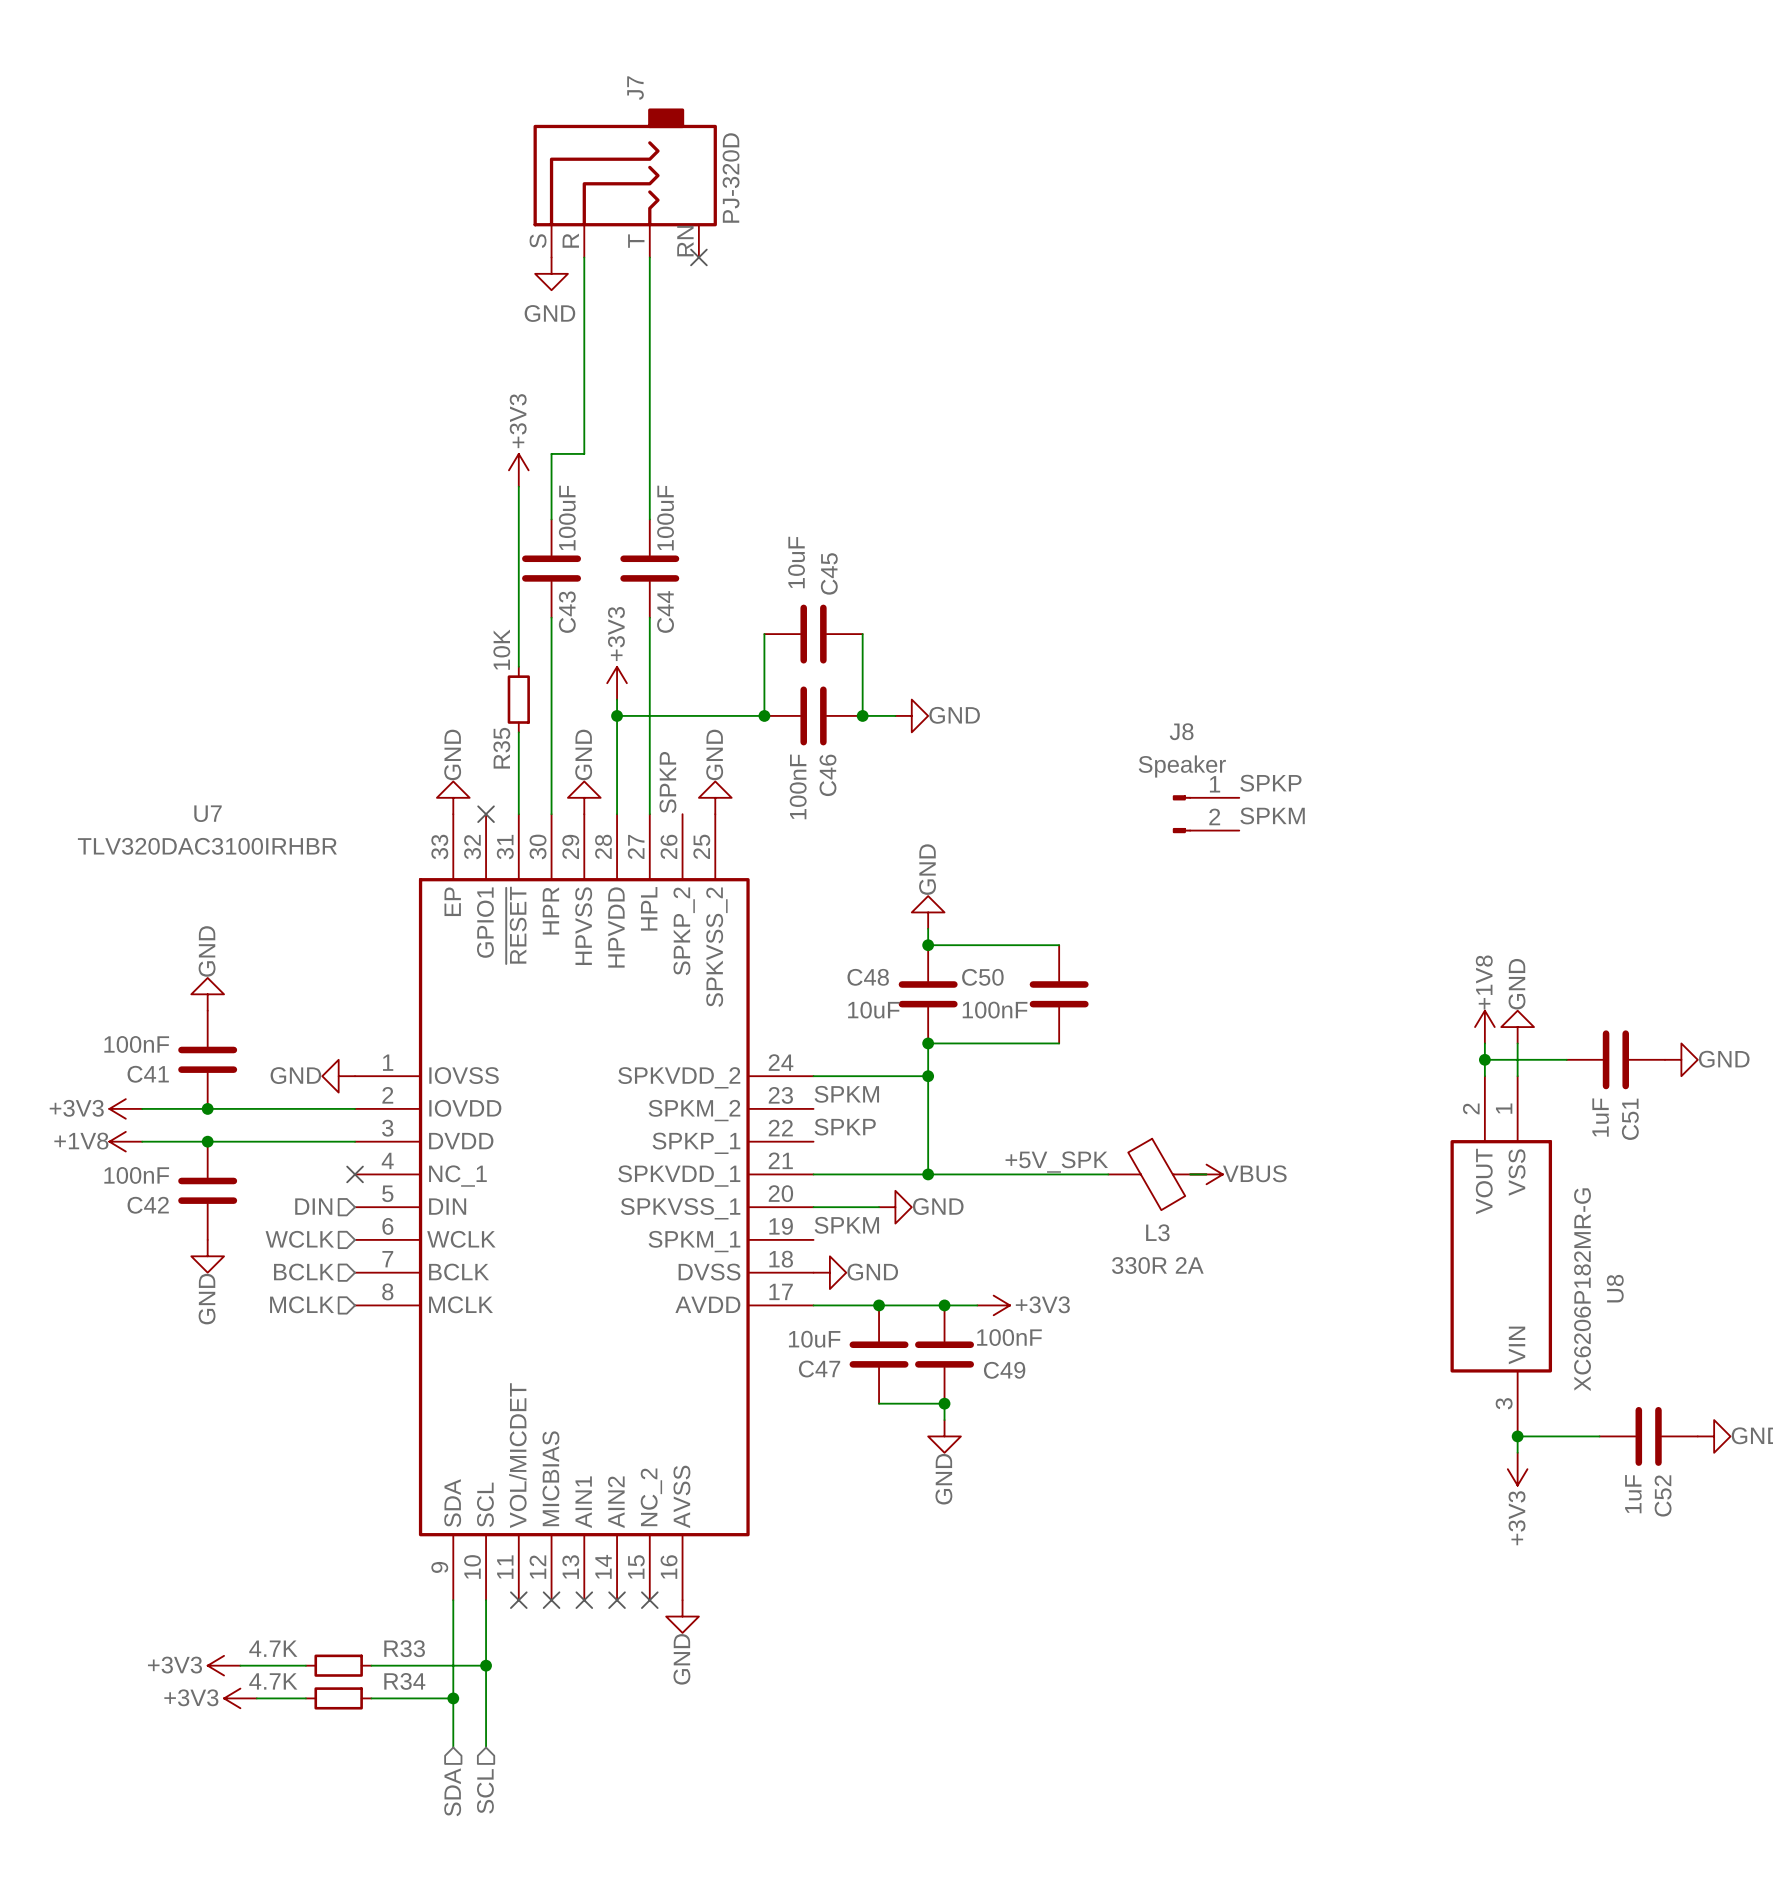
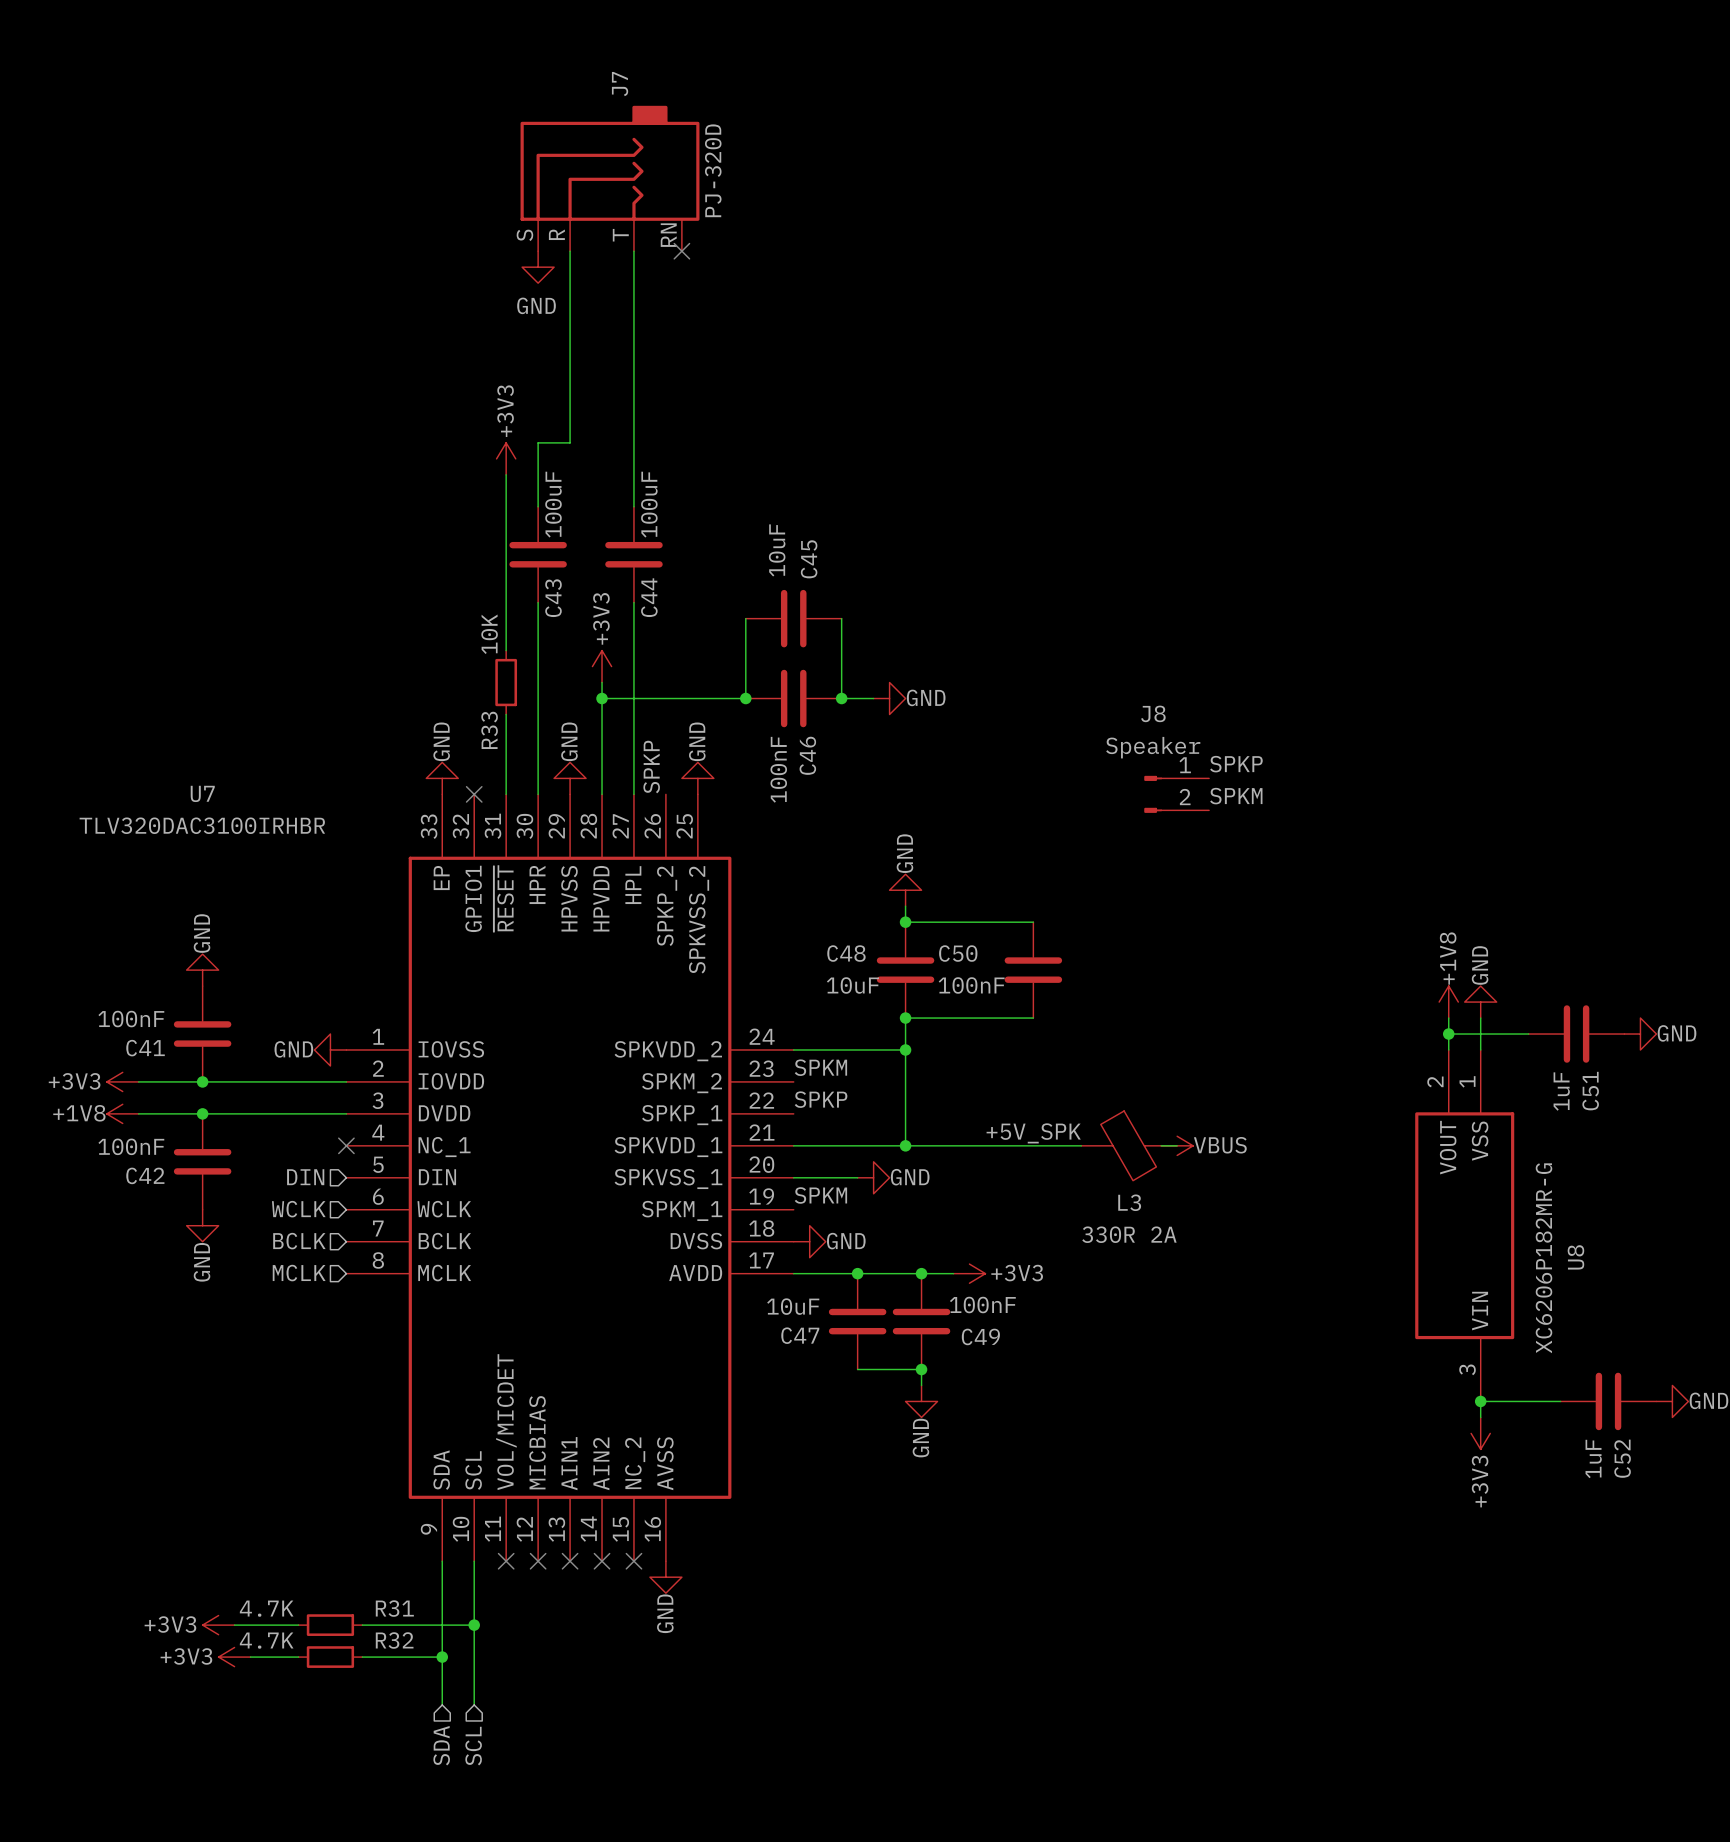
R35 name: R35 (501, 748) -> R33 (489, 730)
R33 name: R33 (404, 1648) -> R31 (394, 1608)
R34 name: R34 (404, 1681) -> R32 (394, 1640)

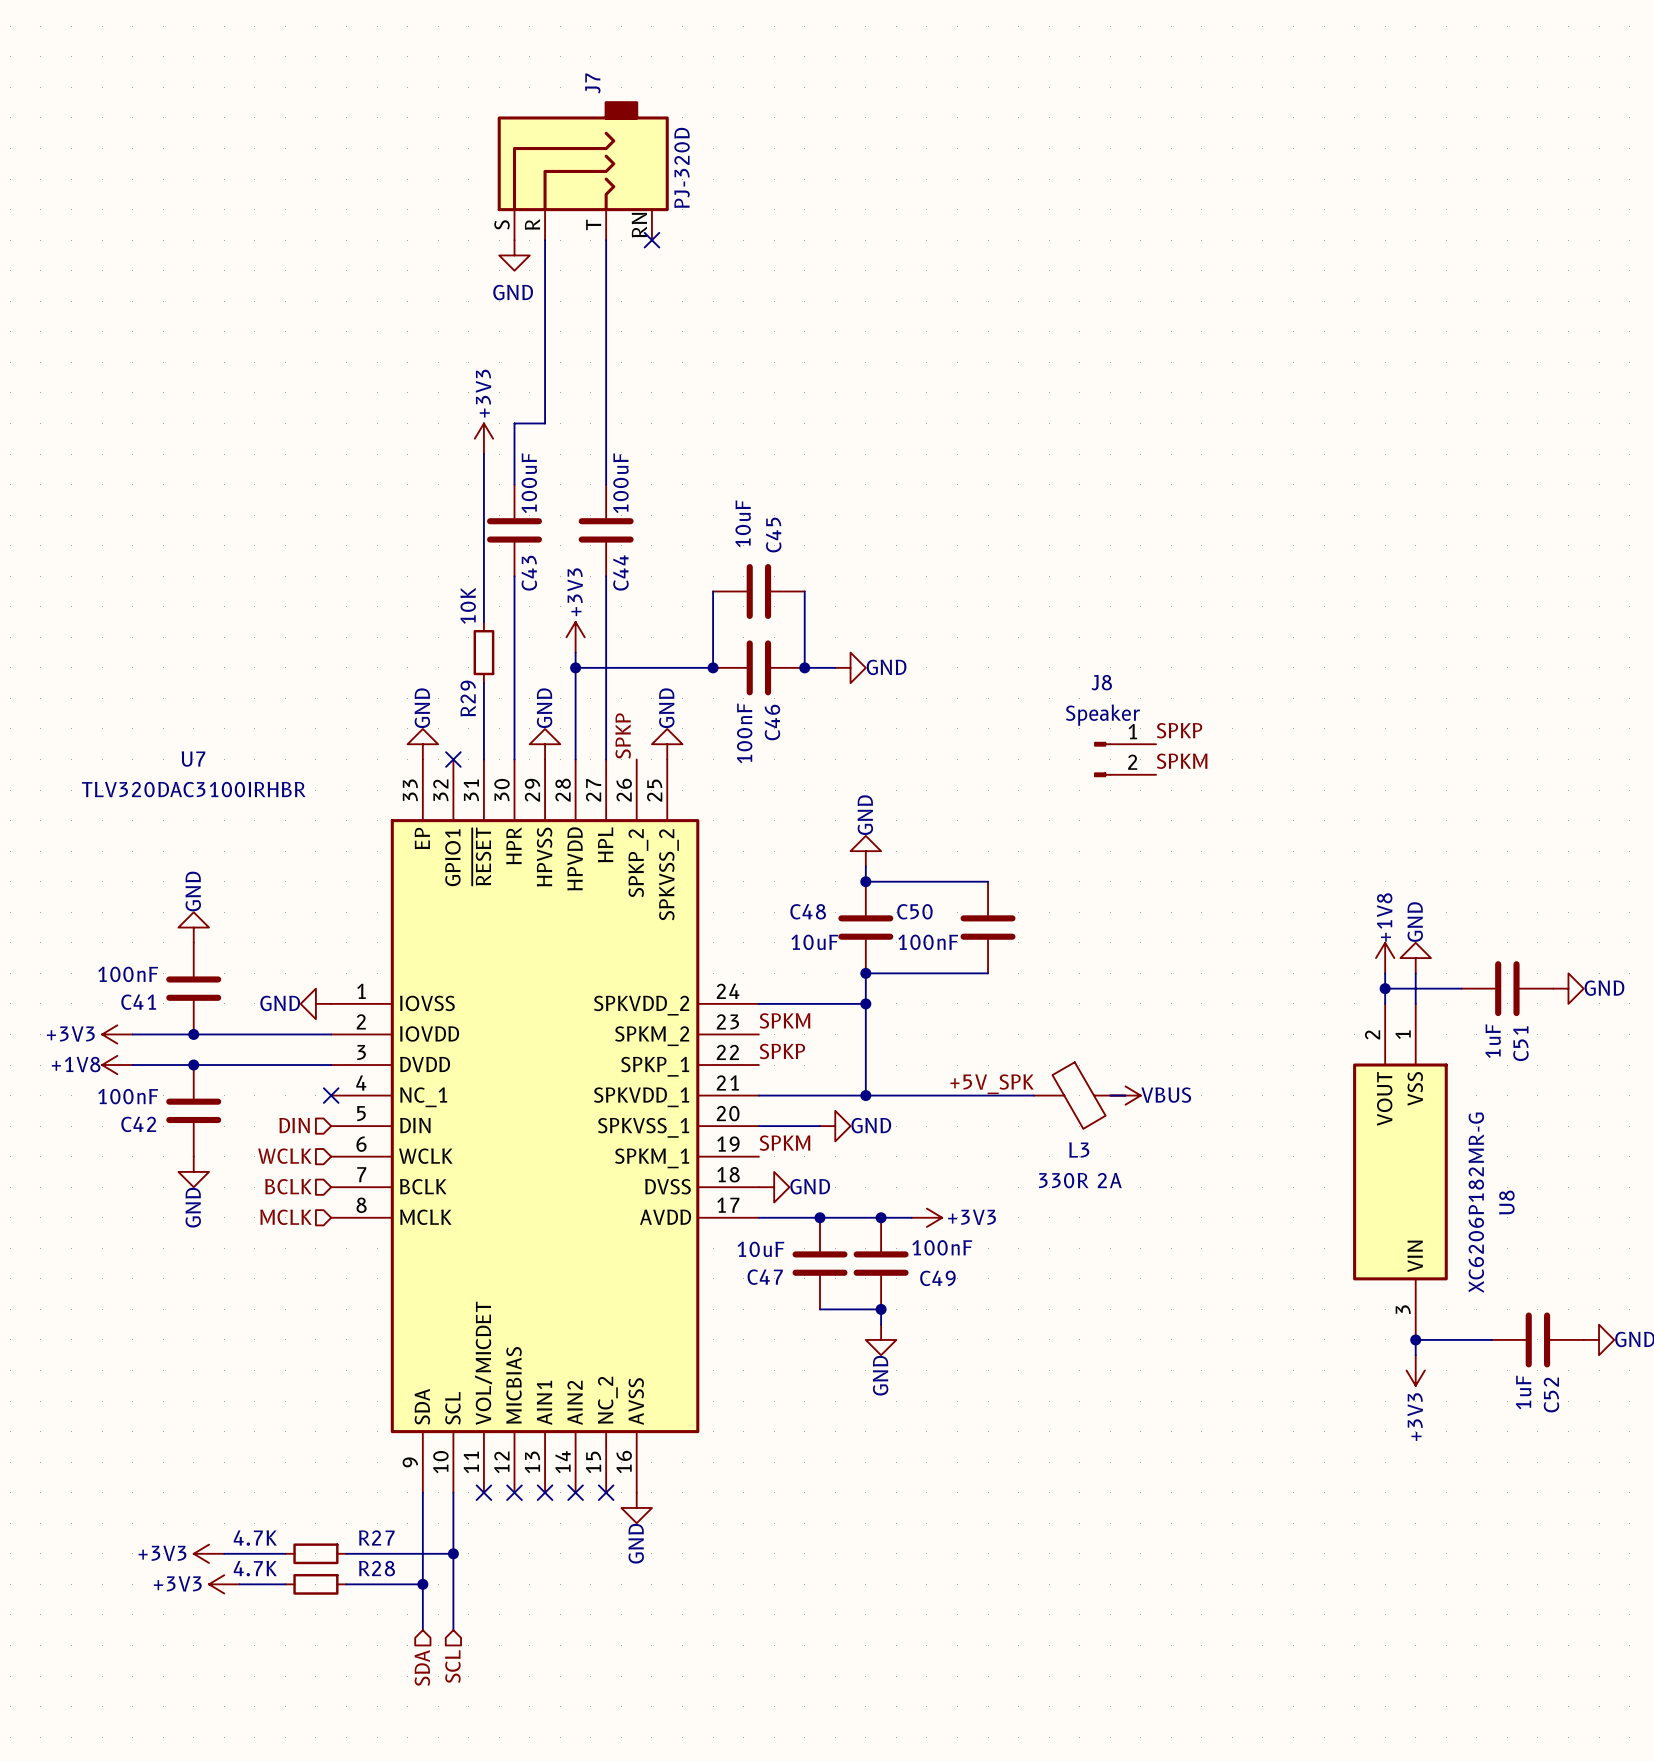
R33 name: R33 (489, 730) -> R29 (468, 698)
R31 name: R31 (394, 1608) -> R27 (376, 1537)
R32 name: R32 (394, 1640) -> R28 (376, 1568)

